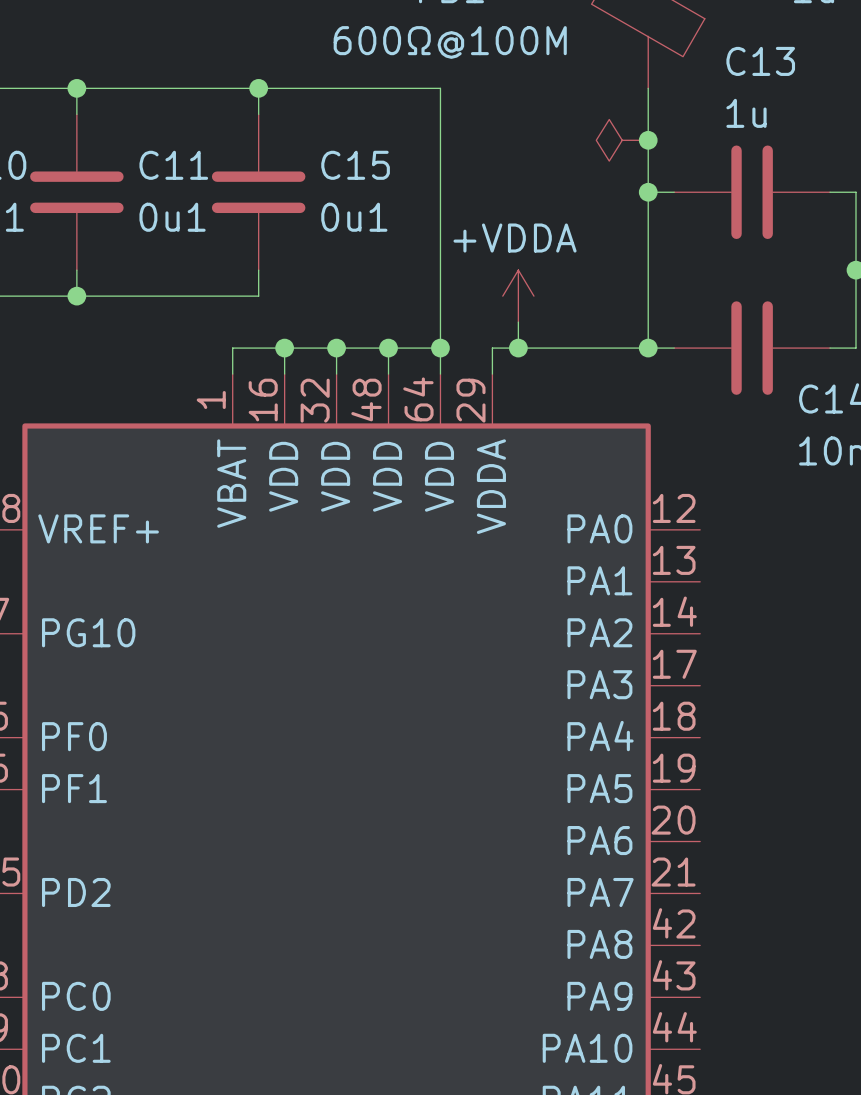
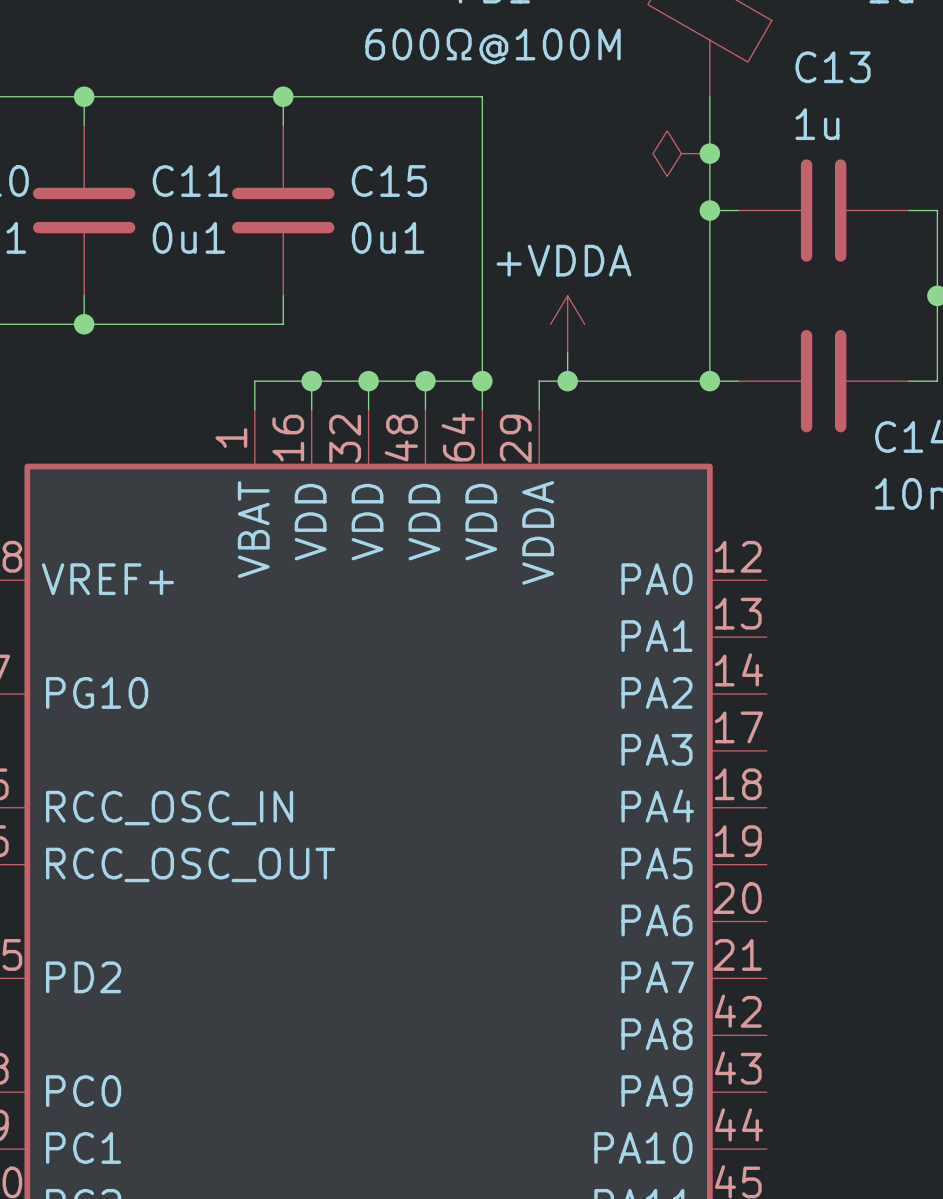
part pin name: PF0 (74, 736) -> RCC_OSC_IN (169, 808)
part pin name: PF1 (74, 788) -> RCC_OSC_OUT (190, 864)

